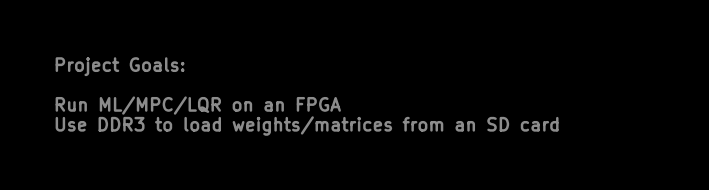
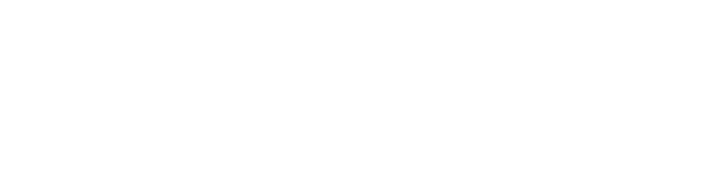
text: Project Goals: (120, 66) -> none
text: Run ML/MPC/LQR on an FPGA (198, 105) -> none
text: Use DDR3 to load weights/matrices from an SD card (307, 126) -> none

